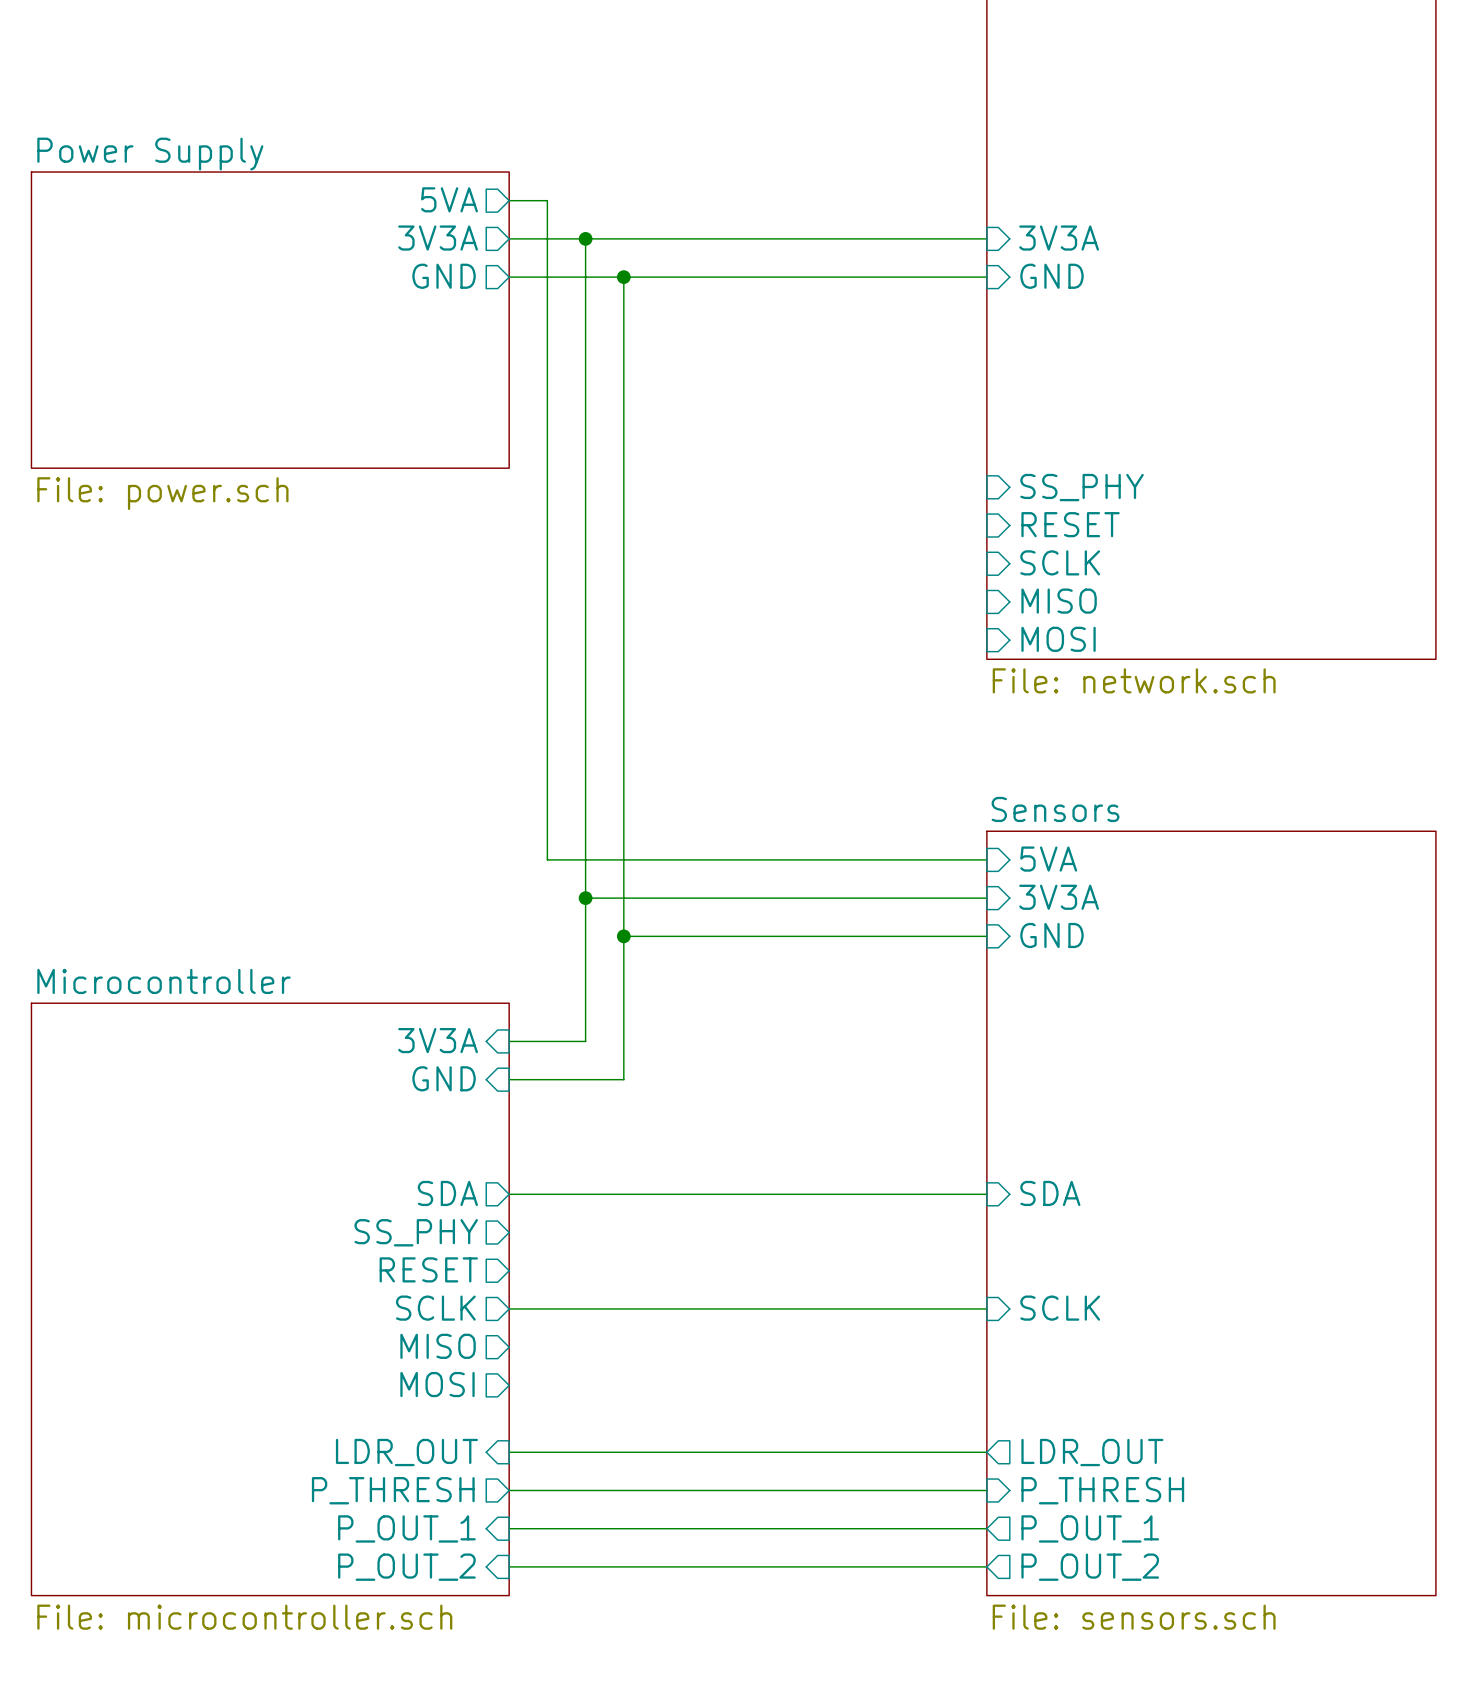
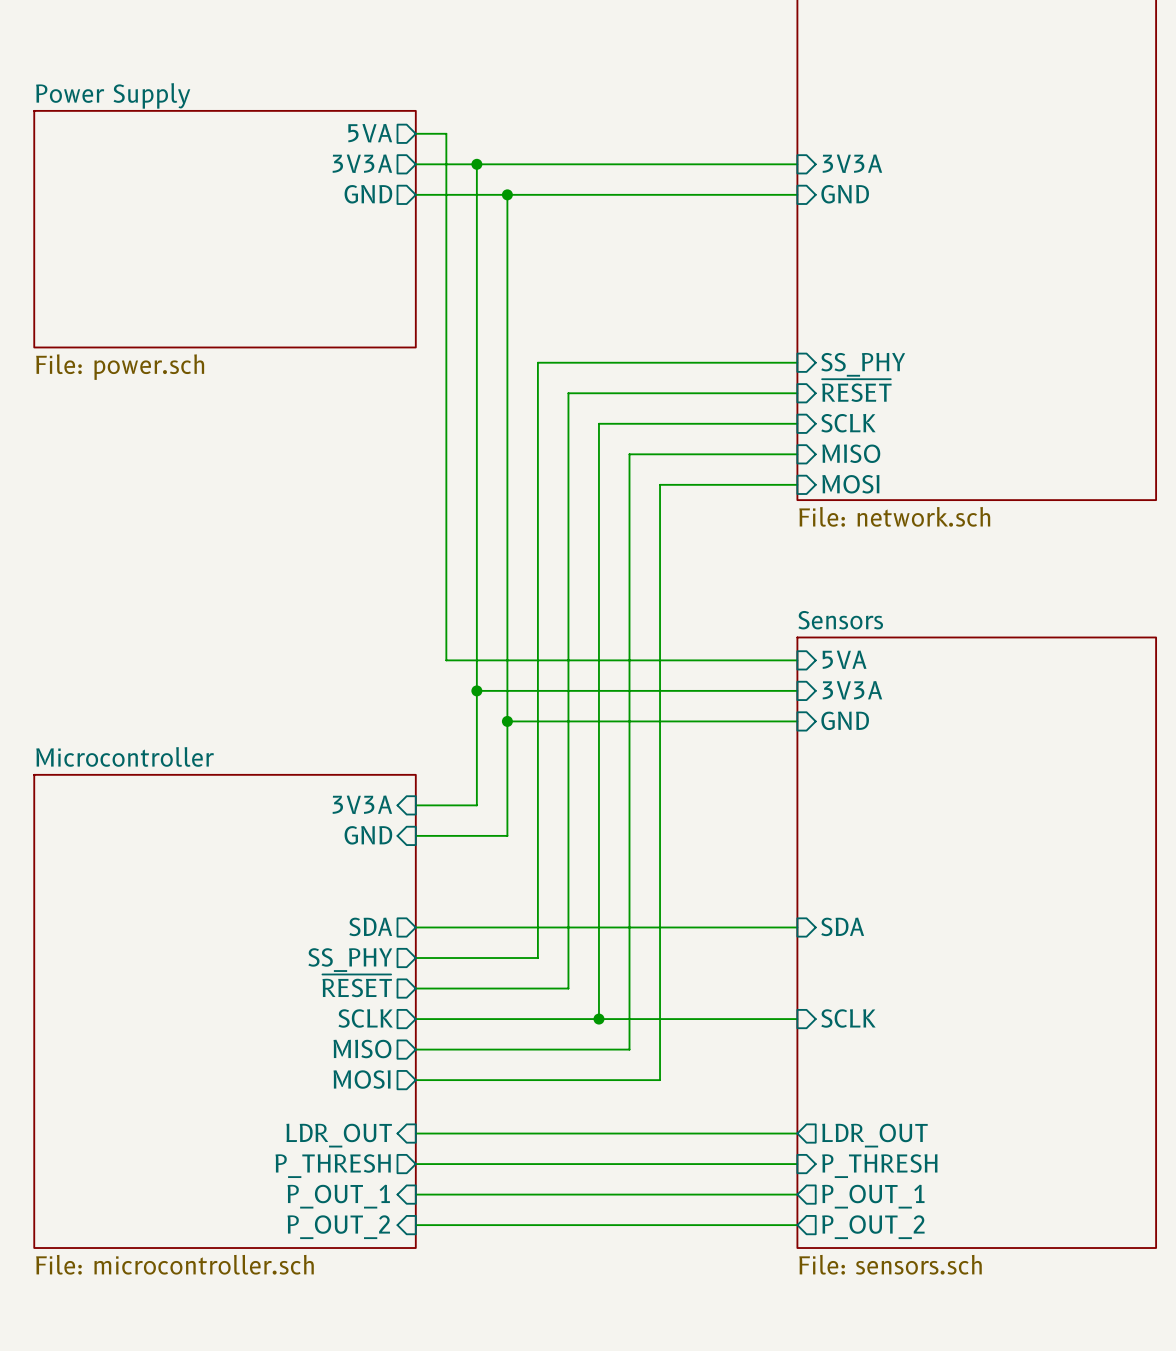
wire: none -> (797, 362) (537, 362) (537, 958) (415, 958)
sheet pin: RESET (1070, 524) -> ~{RESET} (856, 390)
wire: none -> (797, 393) (568, 393) (568, 988) (415, 988)
wire: none -> (797, 423) (598, 423) (598, 1019)
wire: none -> (797, 454) (629, 454) (629, 1049) (415, 1049)
wire: none -> (797, 484) (660, 484) (660, 1080) (415, 1080)
sheet pin: RESET (428, 1269) -> ~{RESET} (357, 985)
junction: none -> (598, 1019)

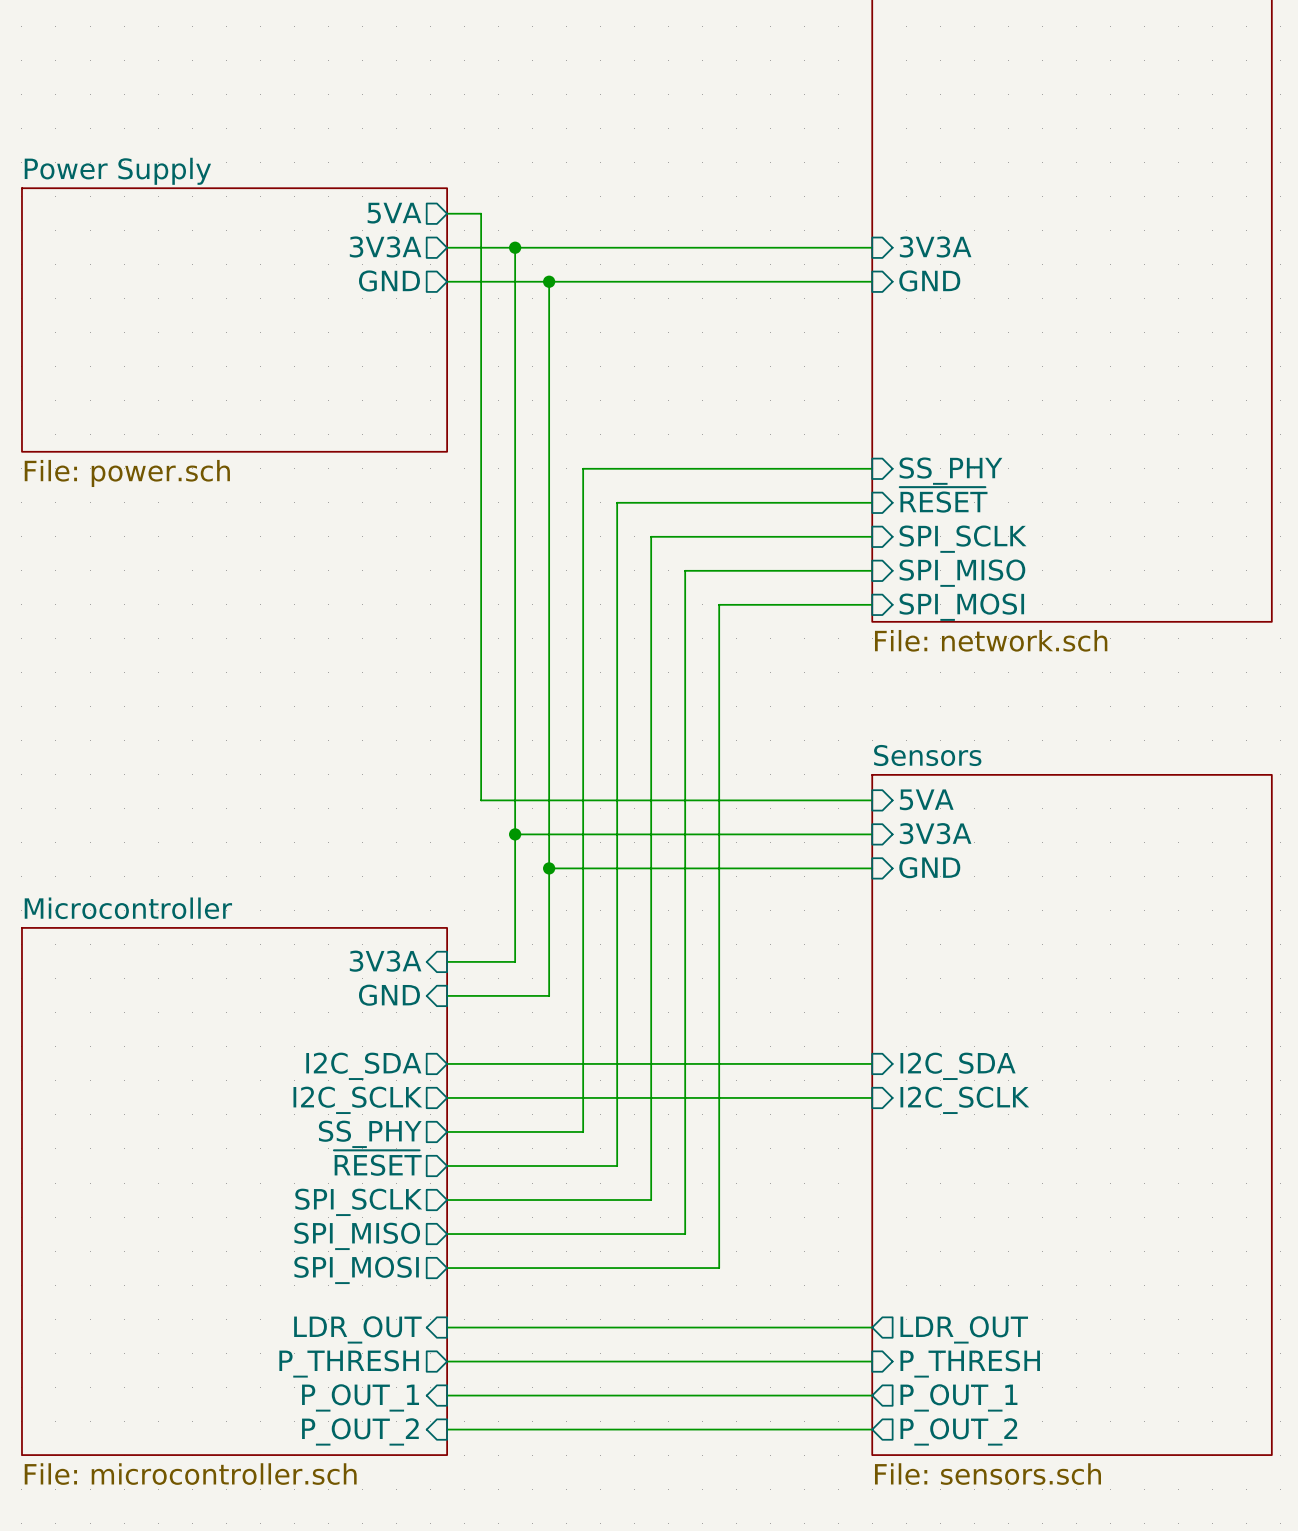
sheet pin: SCLK (848, 423) -> SPI_SCLK (963, 539)
sheet pin: MISO (851, 453) -> SPI_MISO (962, 573)
sheet pin: MOSI (850, 484) -> SPI_MOSI (961, 607)
wire: none -> (447, 1063) (872, 1063)
sheet pin: none -> I2C_SDA (363, 1066)
sheet pin: none -> I2C_SDA (958, 1066)
sheet pin: SDA (370, 926) -> I2C_SCLK (357, 1100)
sheet pin: SDA (842, 926) -> I2C_SCLK (964, 1100)
sheet pin: SCLK (365, 1018) -> SPI_SCLK (358, 1202)
sheet pin: SCLK (848, 1018) -> none
wire: (598, 1019) (797, 1019) -> none
junction: (598, 1019) -> none
sheet pin: MISO (362, 1049) -> SPI_MISO (357, 1236)
sheet pin: MOSI (362, 1079) -> SPI_MOSI (356, 1270)

